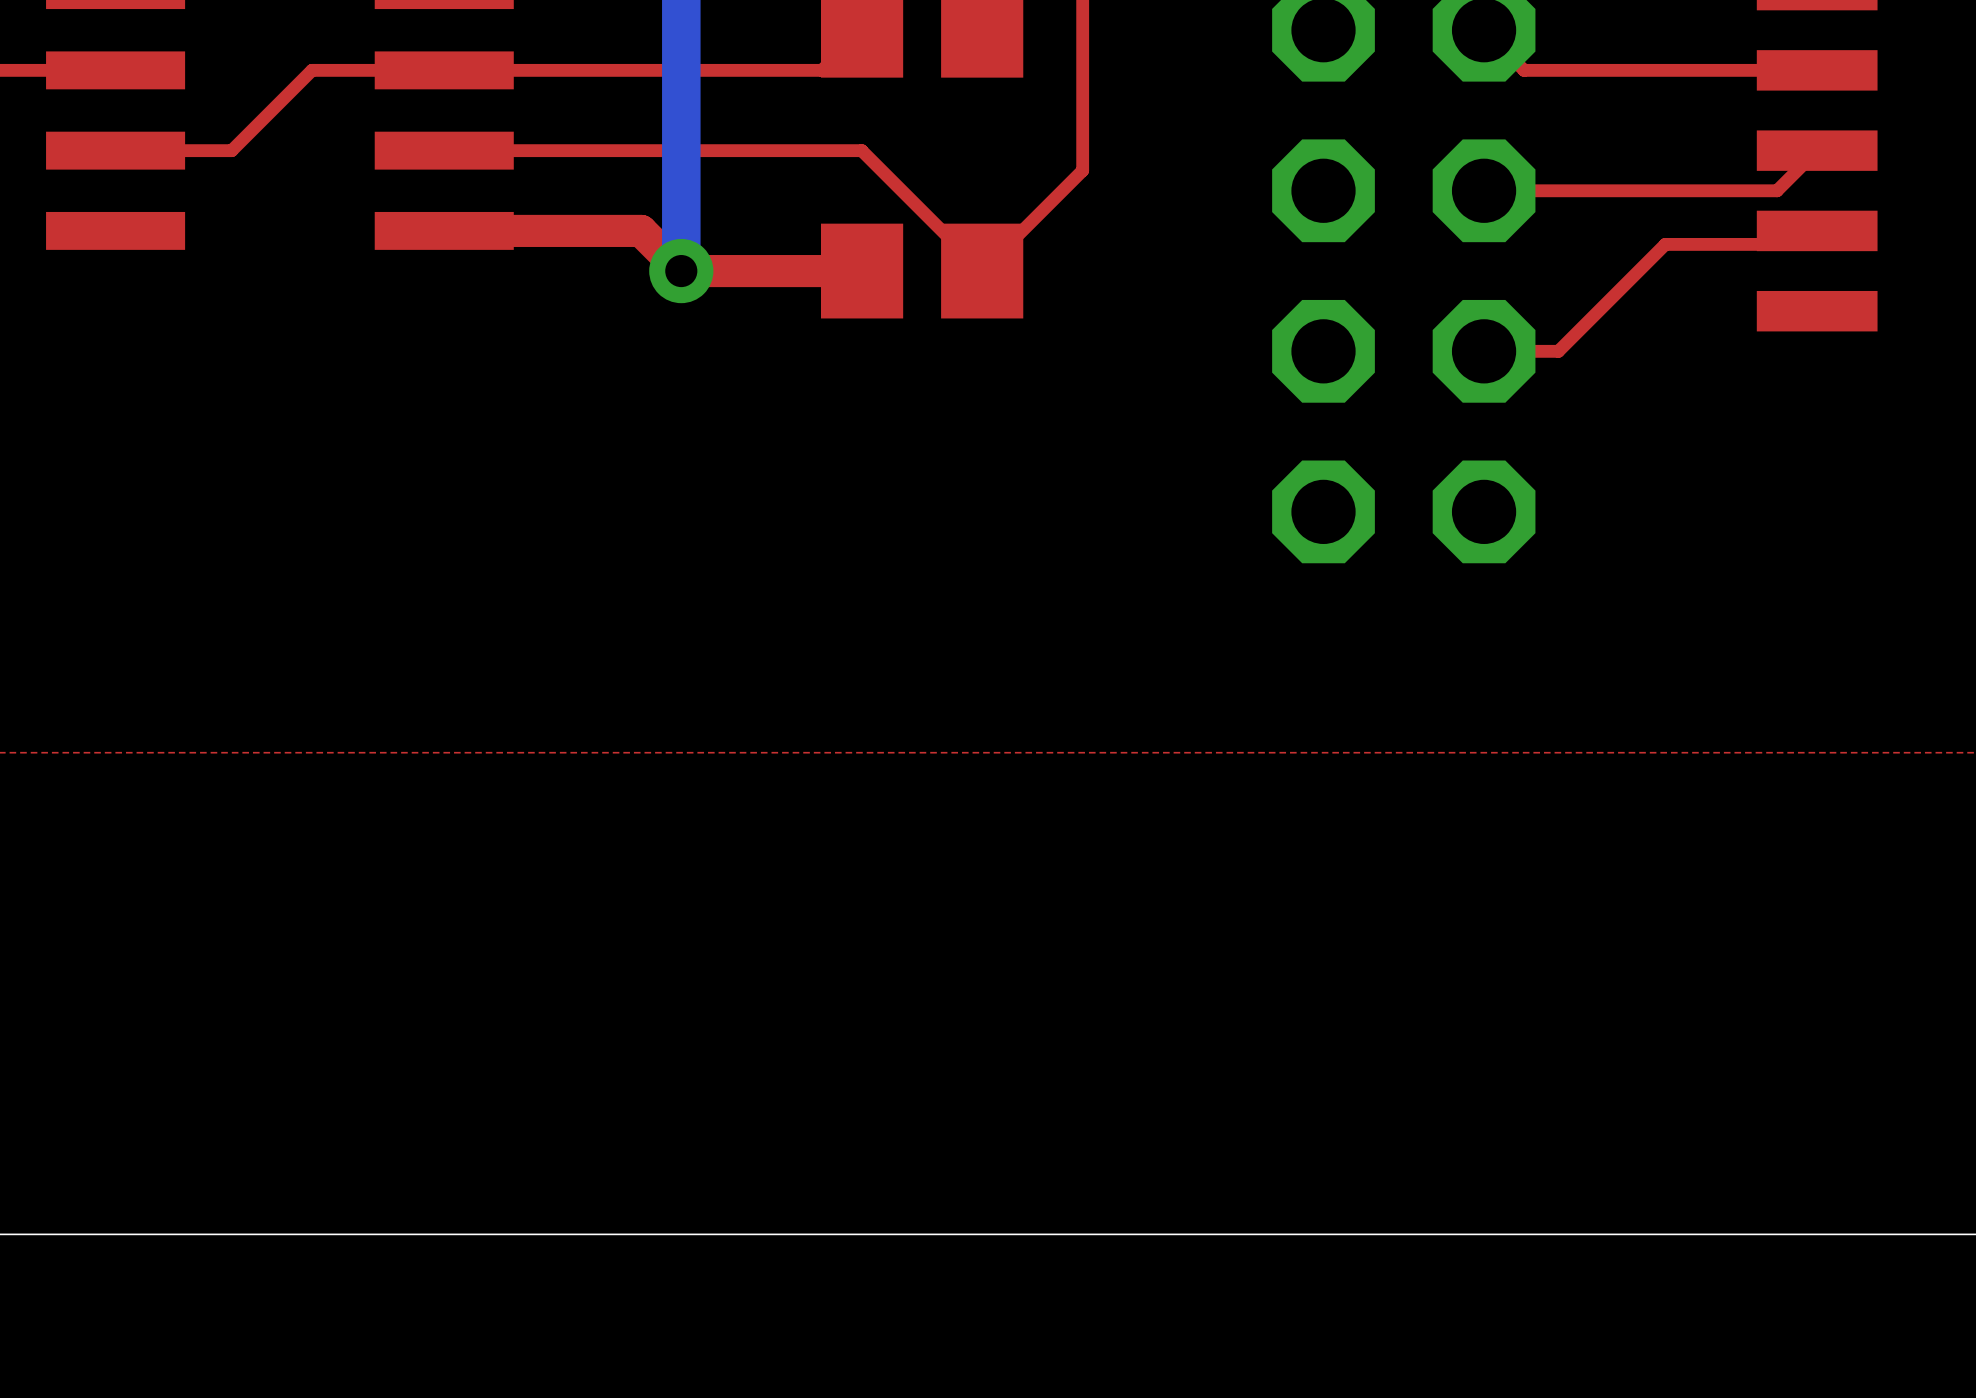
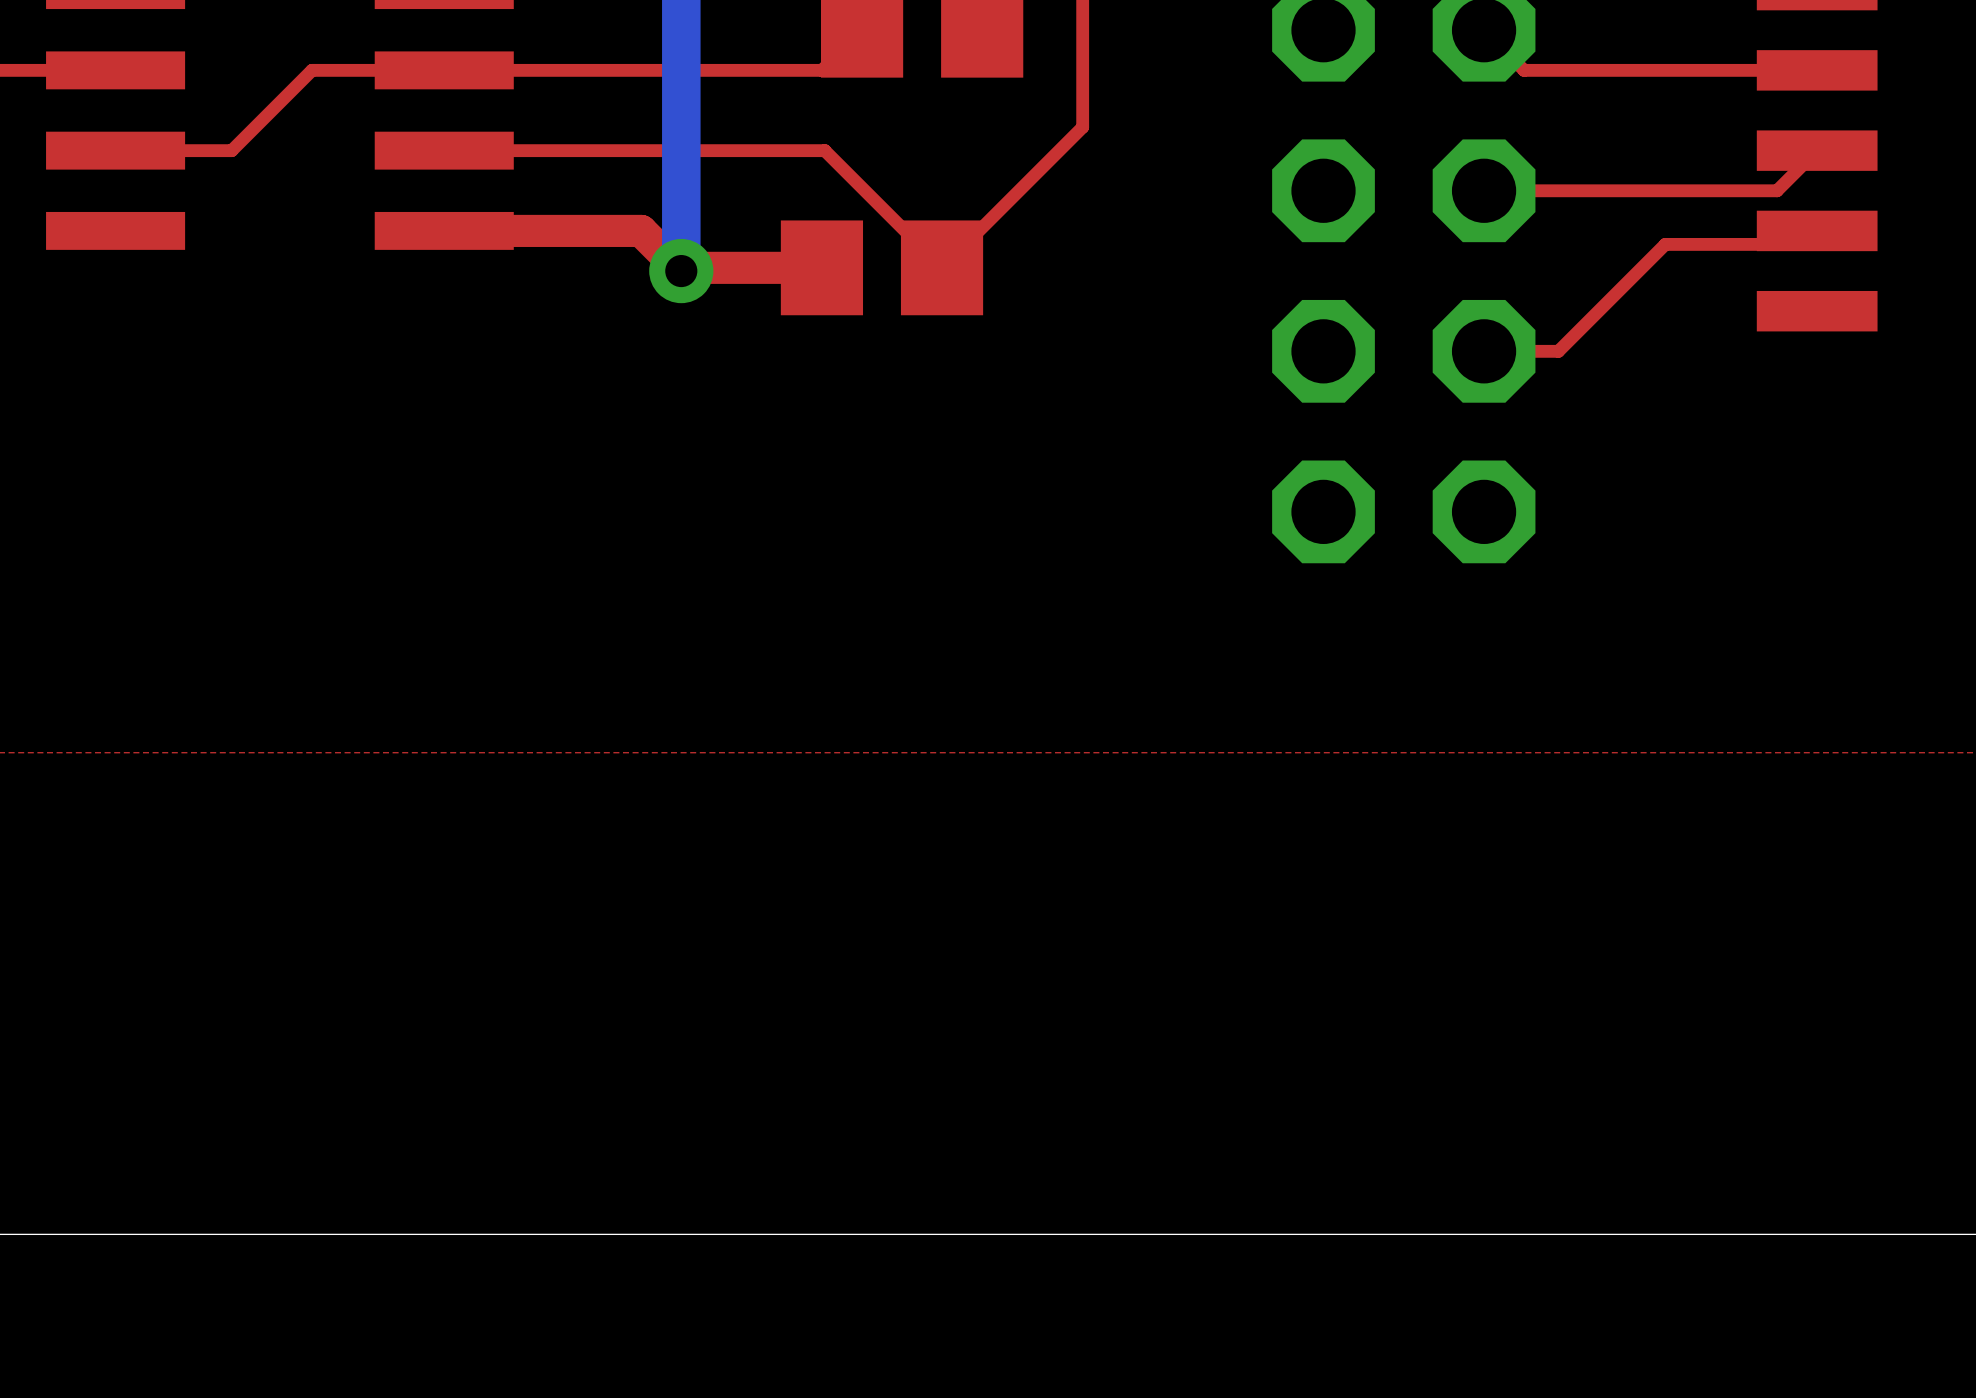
top track: (1082, 127) (1082, 170) (982, 271) (861, 150) (824, 150) -> (1082, 127) (942, 267) (824, 150)
top track: (862, 271) (681, 271) -> (821, 267) (684, 267) (681, 271)
part position: (922, 271) -> (881, 267)

